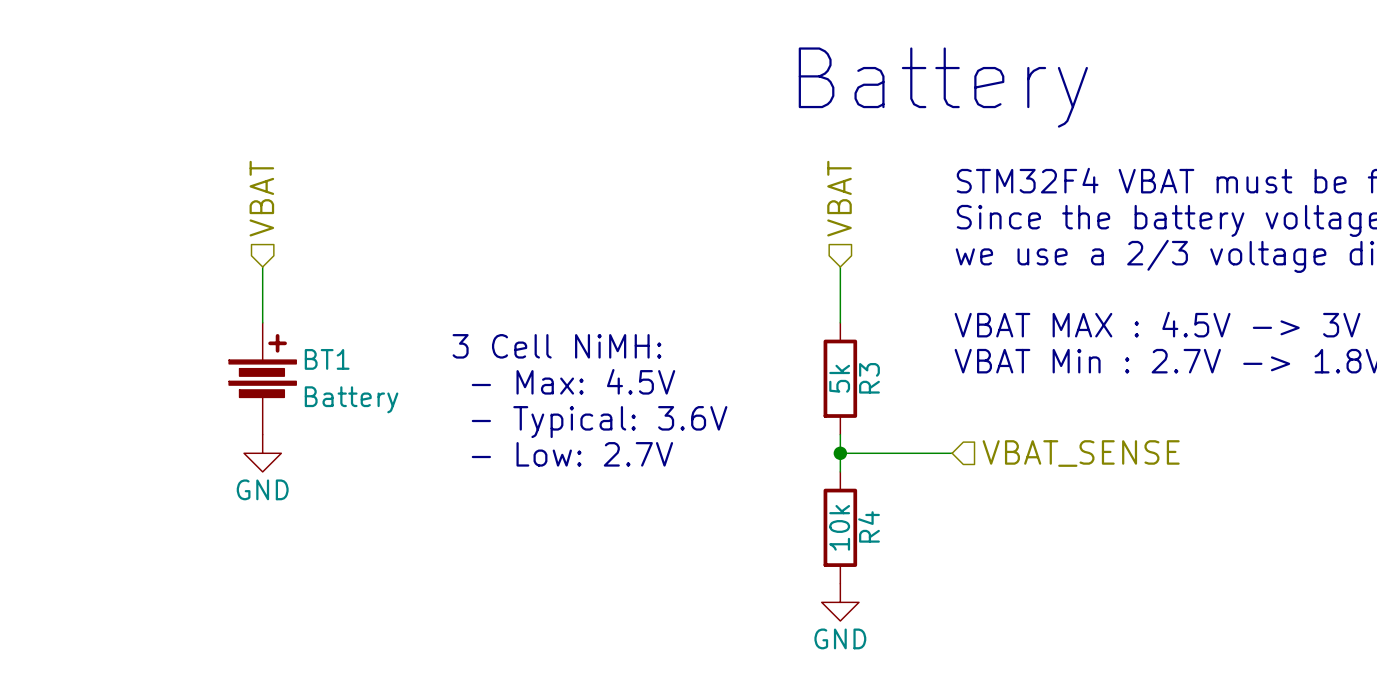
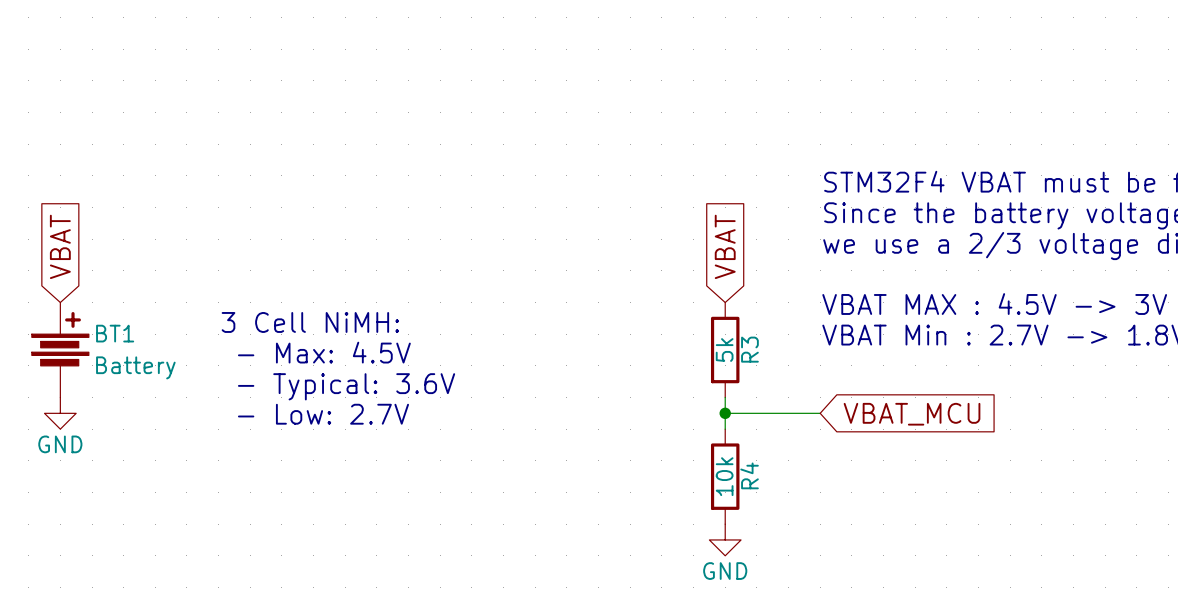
text: Battery (943, 87) -> none
hierarchical label: VBAT (261, 198) -> none
hierarchical label: VBAT (839, 198) -> none
global label: none -> VBAT (60, 246)
global label: none -> VBAT (725, 246)
wire: (262, 266) (262, 322) -> none
wire: (840, 266) (840, 322) -> none
text position: 3 Cell NiMH: (556, 346) -> 3 Cell NiMH: (310, 322)
BT1 position: (262, 378) -> (60, 350)
text position: - Max: 4.5V (573, 381) -> - Max: 4.5V (324, 352)
text position: - Typical: 3.6V (599, 422) -> - Typical: 3.6V (346, 386)
power symbol position: GND (262, 453) -> GND (60, 413)
hierarchical label: VBAT_SENSE (1081, 453) -> none
text position: - Low: 2.7V (572, 454) -> - Low: 2.7V (323, 414)
global label: none -> VBAT_MCU (912, 414)

